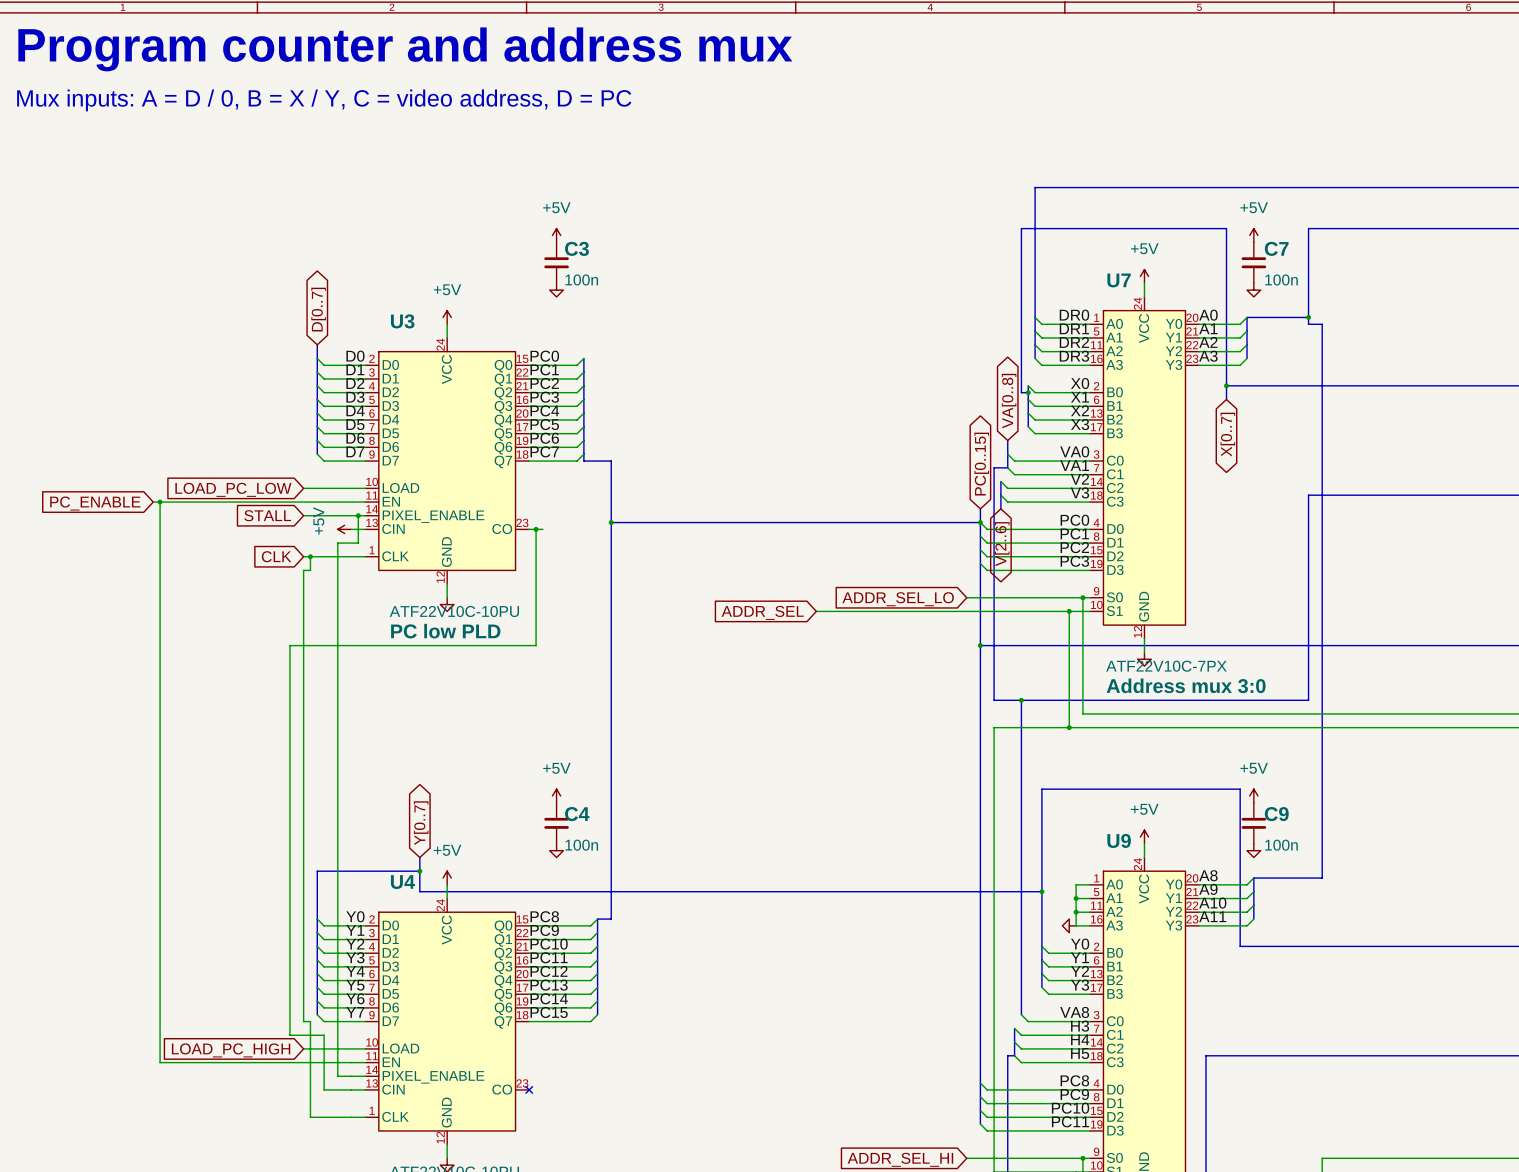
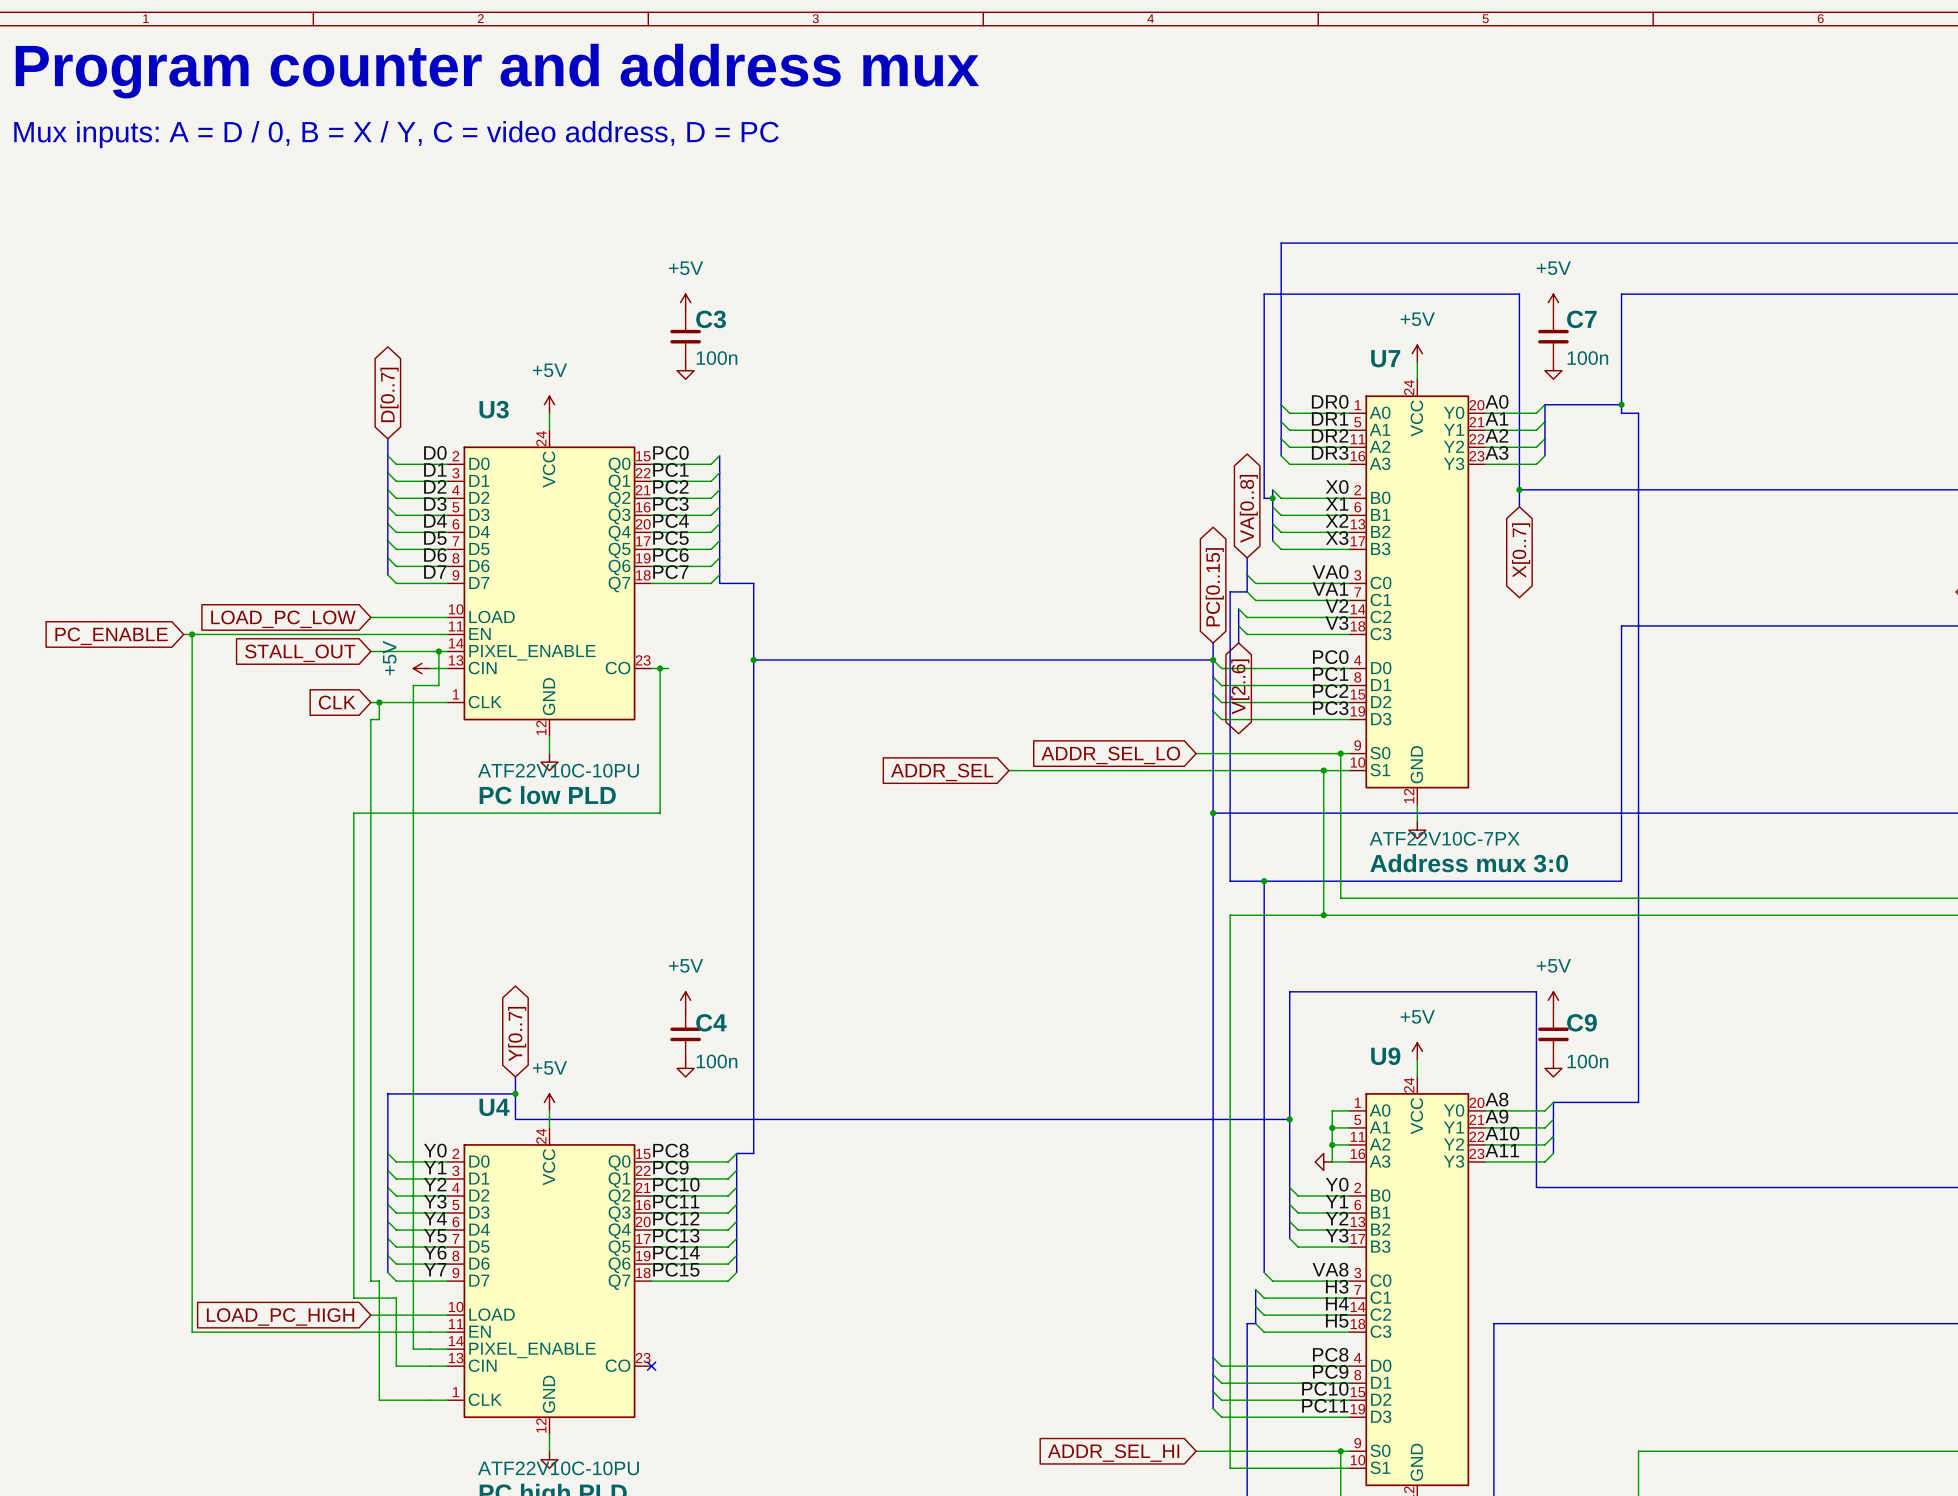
global label: STALL (267, 515) -> STALL_OUT (300, 653)

